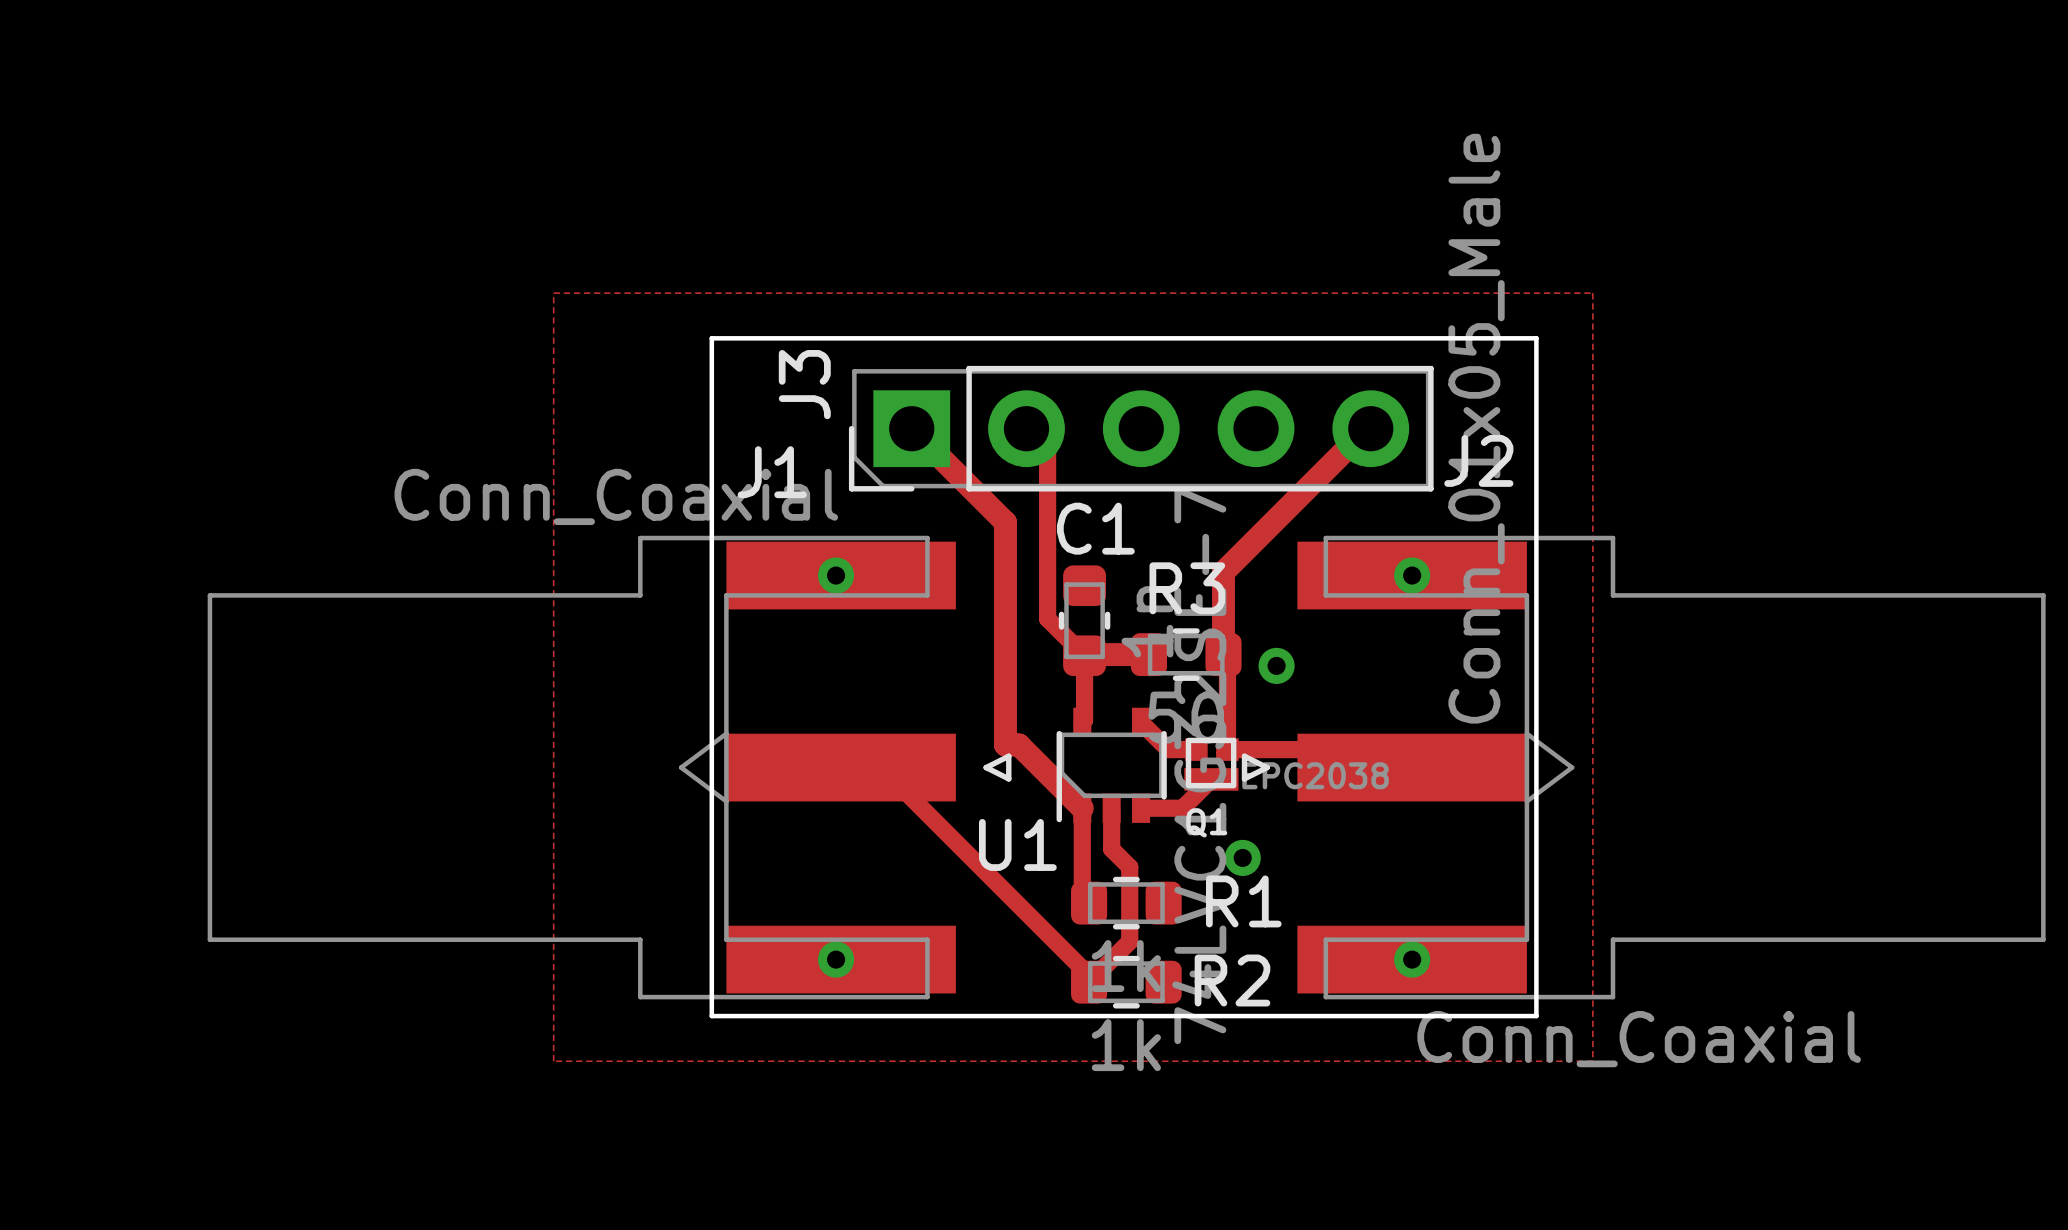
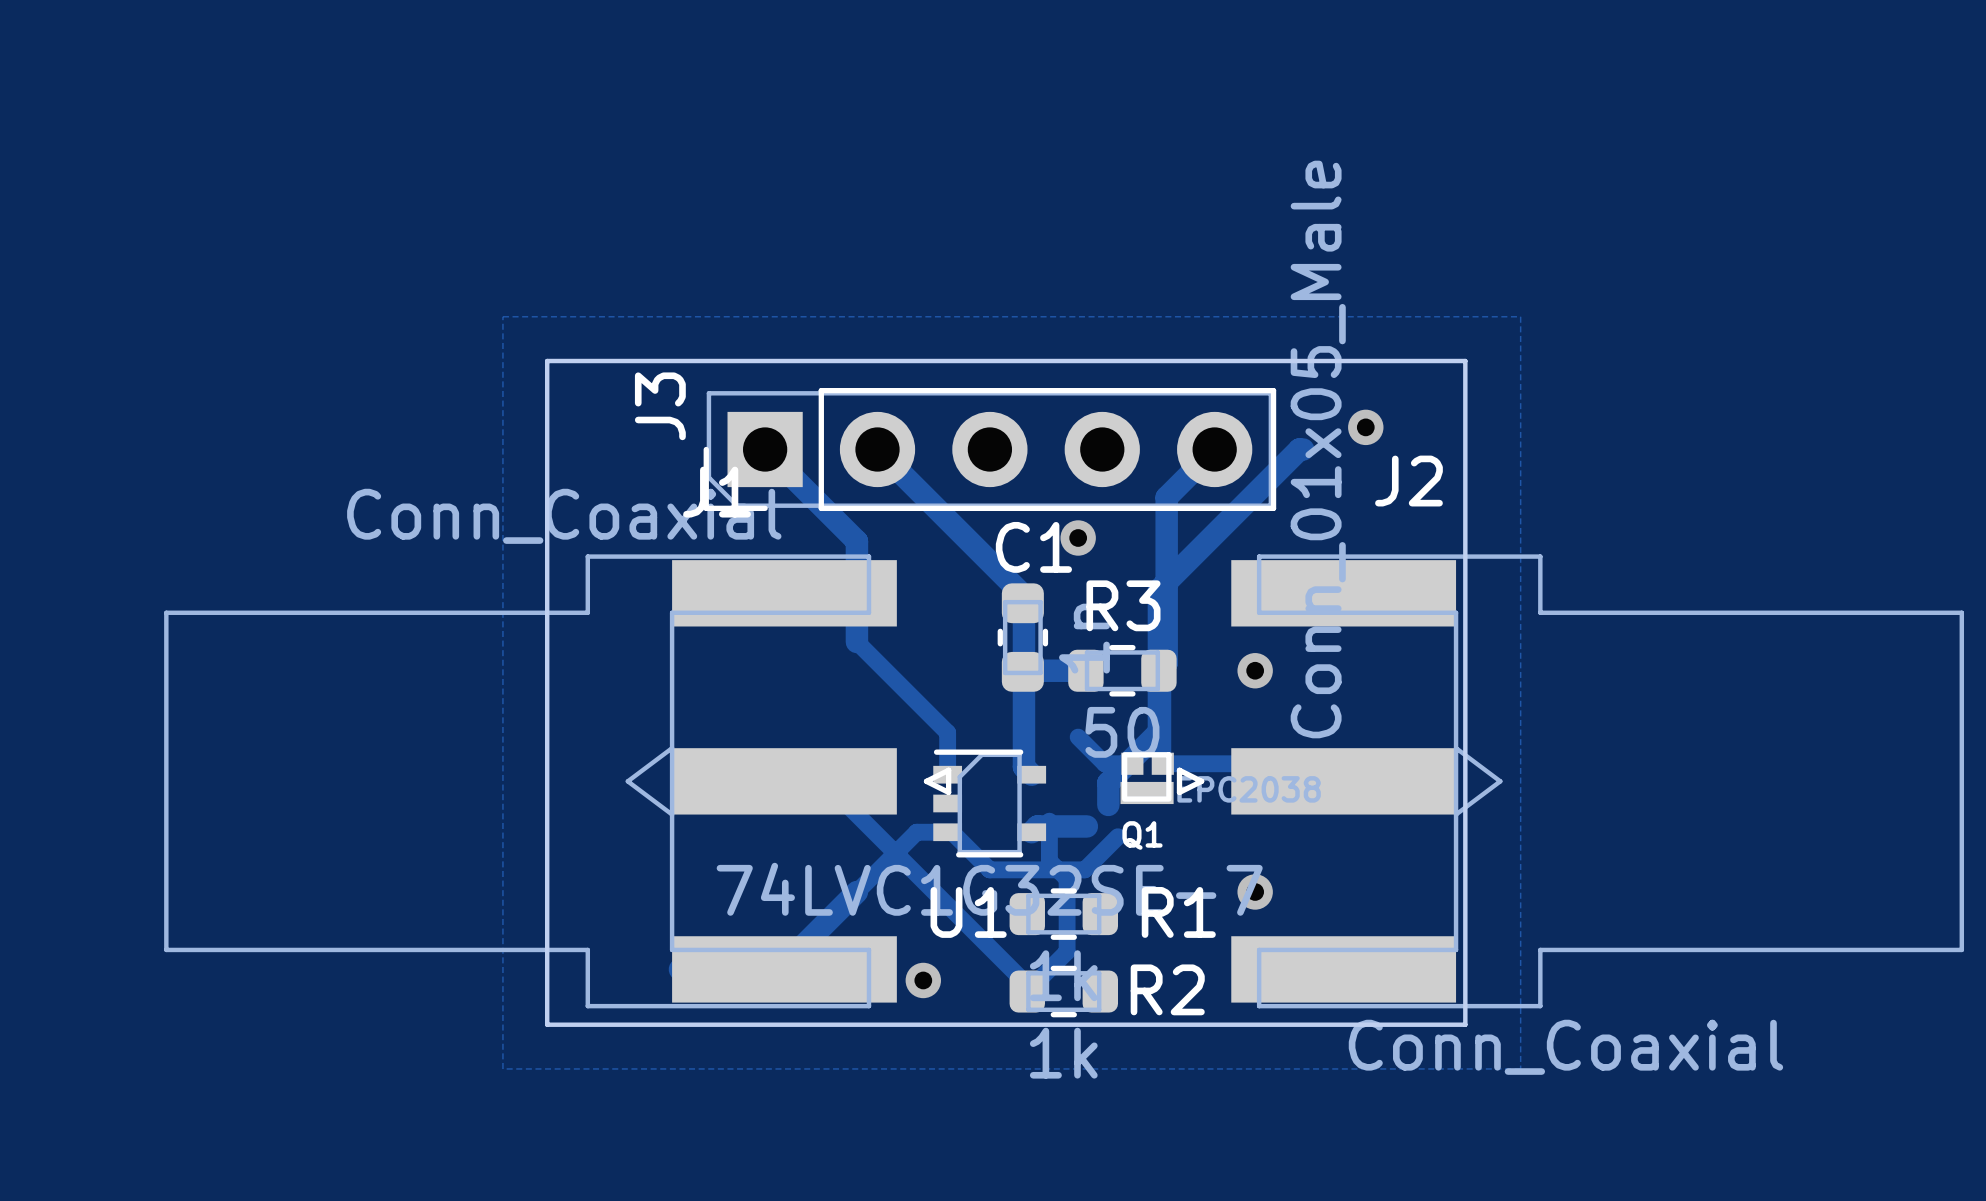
board edge: (711, 338) (711, 1016) -> (657, 361) (547, 361) (547, 1024) (657, 1024)
via: none -> (1365, 427)
track: none -> (765, 449) (856, 541) (856, 641) (947, 732) (947, 774)
track: (911, 428) (1005, 522) (1005, 744) (1019, 744) (1082, 808) (1082, 896) (1089, 903) -> none
track: none -> (877, 449) (1023, 595) (1023, 766) (1031, 774)
track: (1026, 428) (1047, 449) (1047, 618) (1084, 655) (1084, 720) (1082, 722) -> none
J3 position: (1141, 428) -> (989, 449)
track: none -> (1214, 449) (1166, 497) (1166, 662) (1158, 670) (1158, 732) (1108, 782) (1108, 804)
via: none -> (1078, 537)
via: (836, 575) -> none
via: (1412, 575) -> none
via position: (1276, 665) -> (1255, 670)
U1 rotation: 0° (1111, 765) -> 90° clockwise (989, 803)
track: (1211, 779) (1182, 808) (1141, 808) -> none
track: none -> (1086, 826) (1037, 826) (1031, 832)
track: none -> (1117, 836) (1084, 869) (989, 869) (952, 832) (916, 832) (779, 969) (679, 969)
via: (1242, 857) -> none
via: none -> (1255, 891)
via: (836, 959) -> none
via: (1412, 959) -> none
via: none -> (923, 980)

